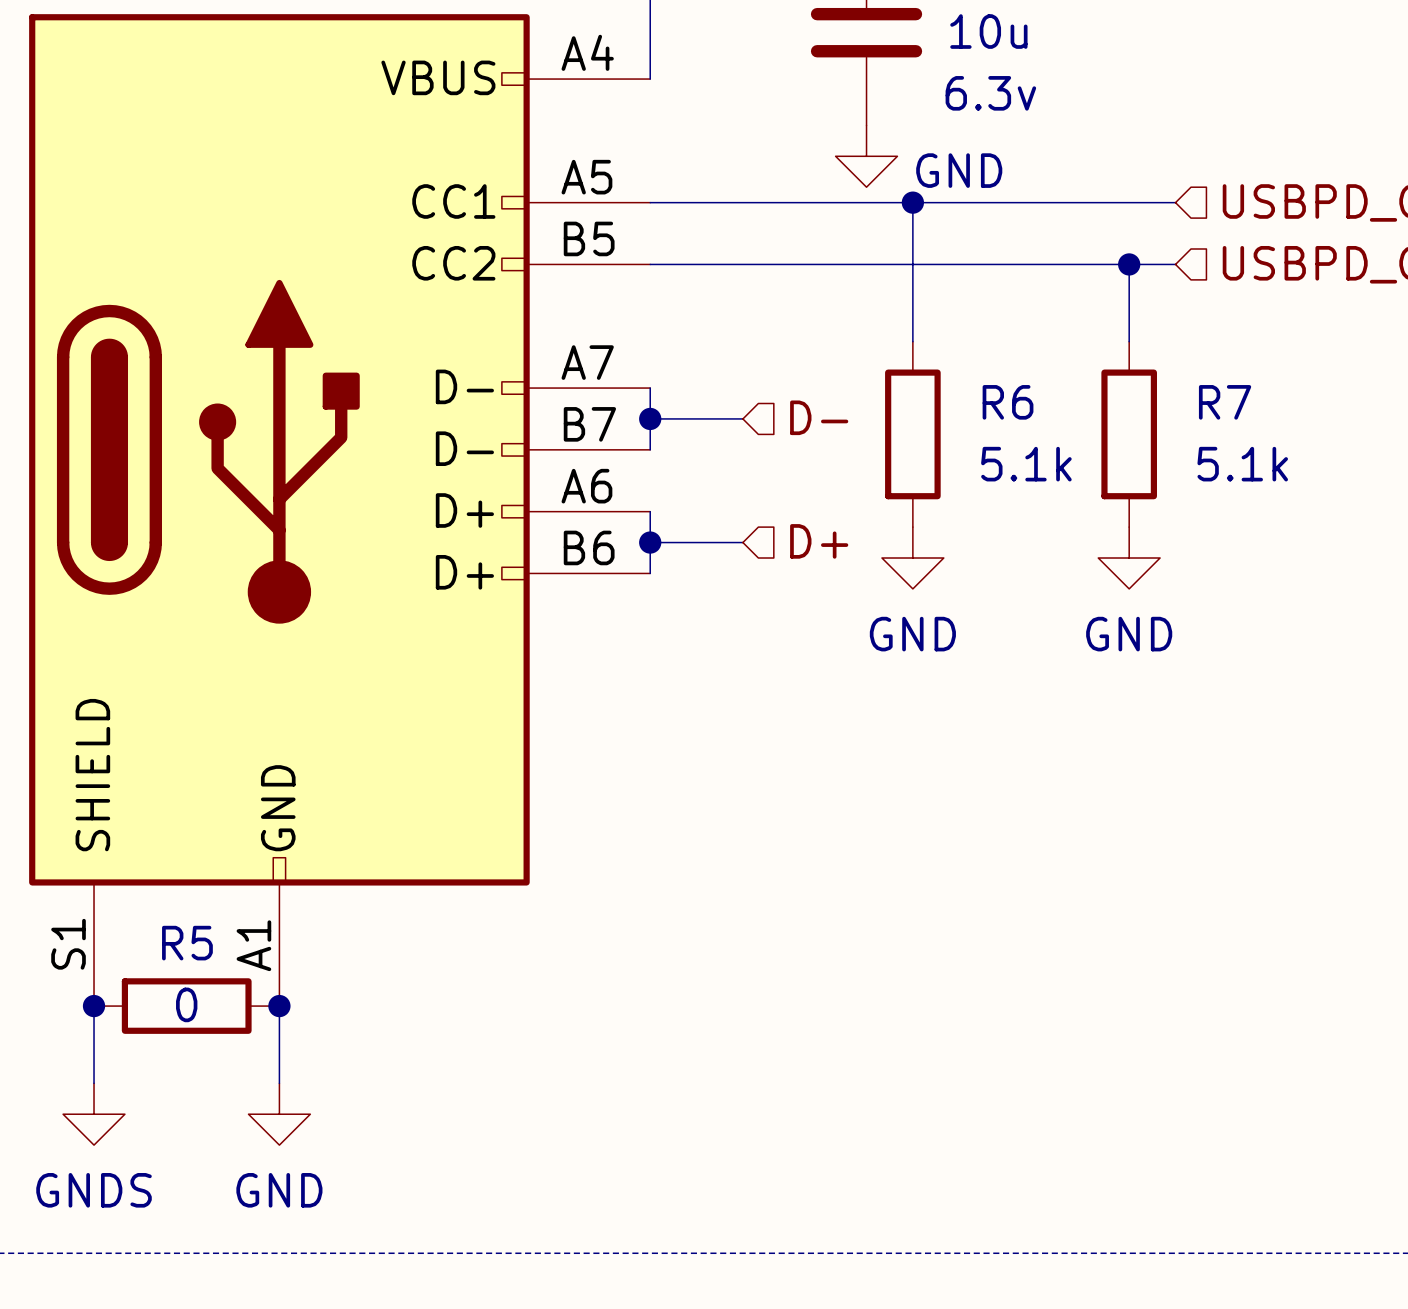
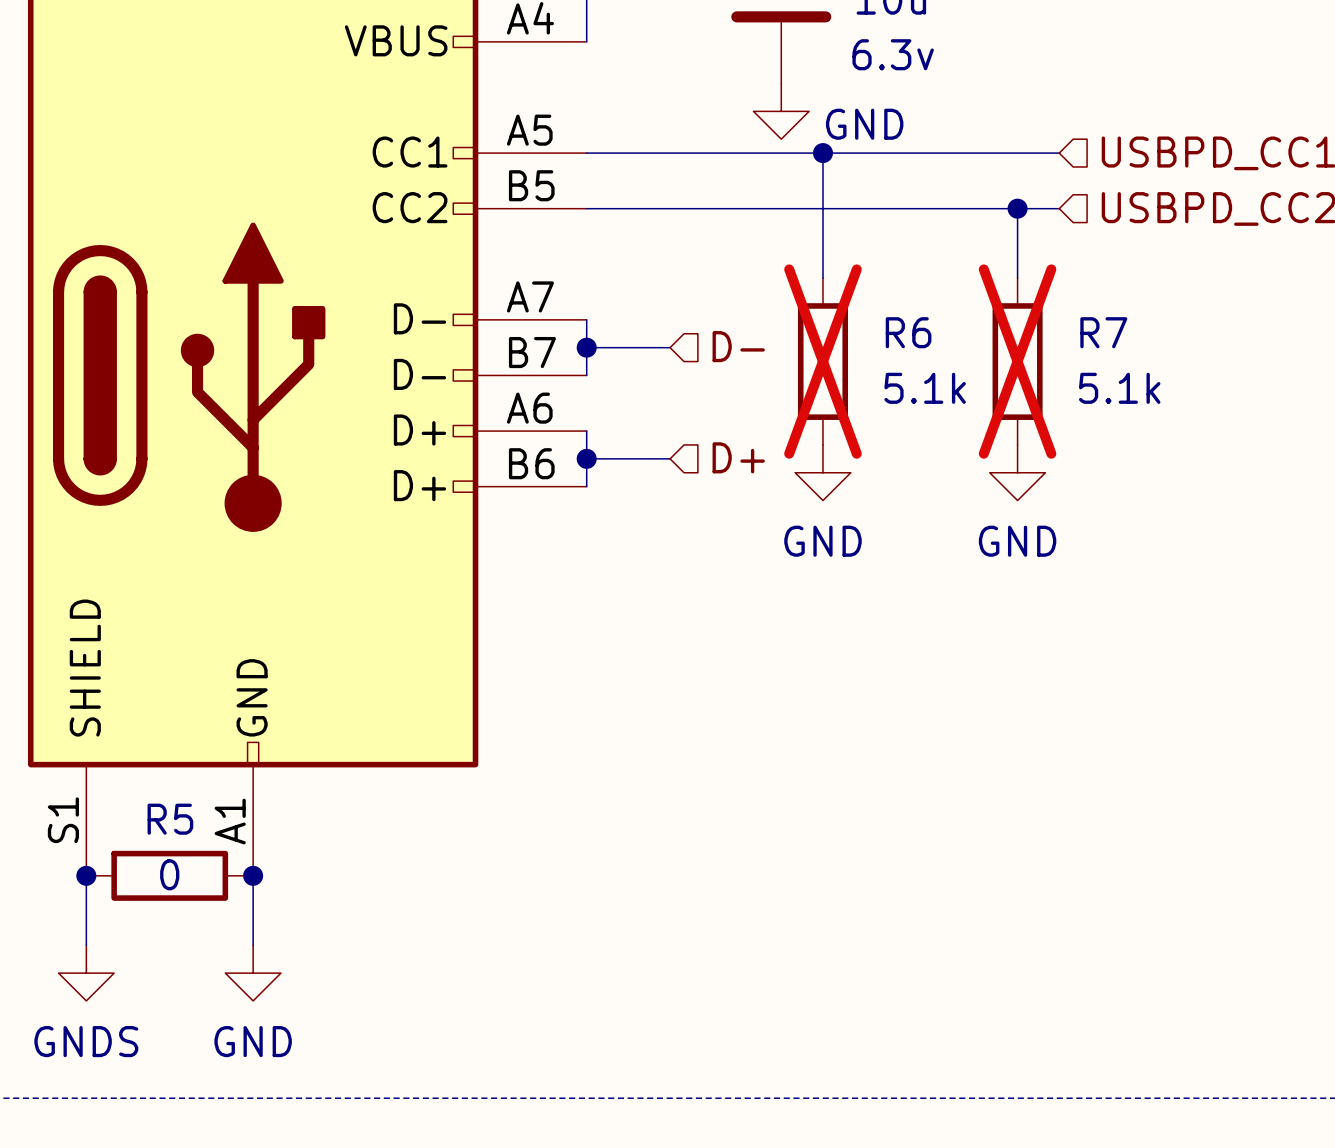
R6 do-not-place cross: none -> (822, 361)
R7 do-not-place cross: none -> (1017, 361)

